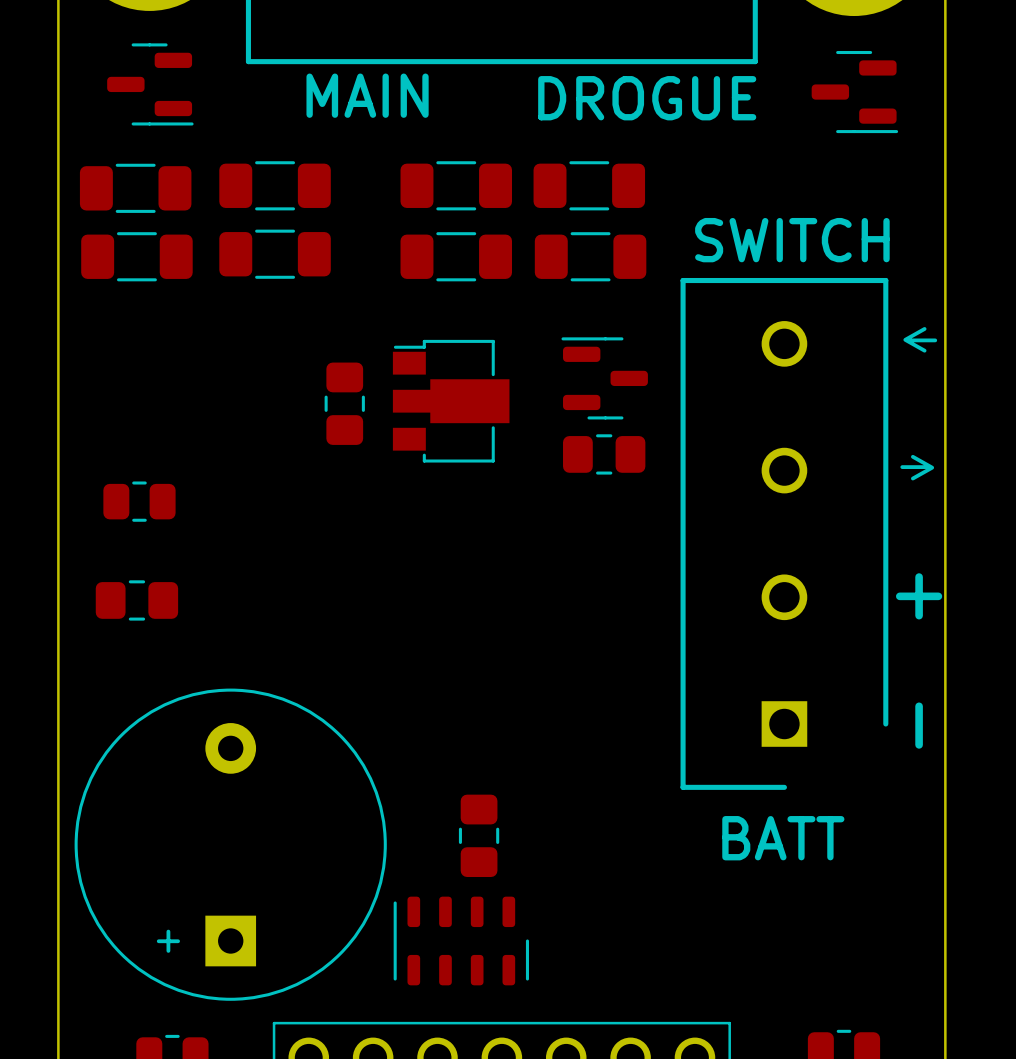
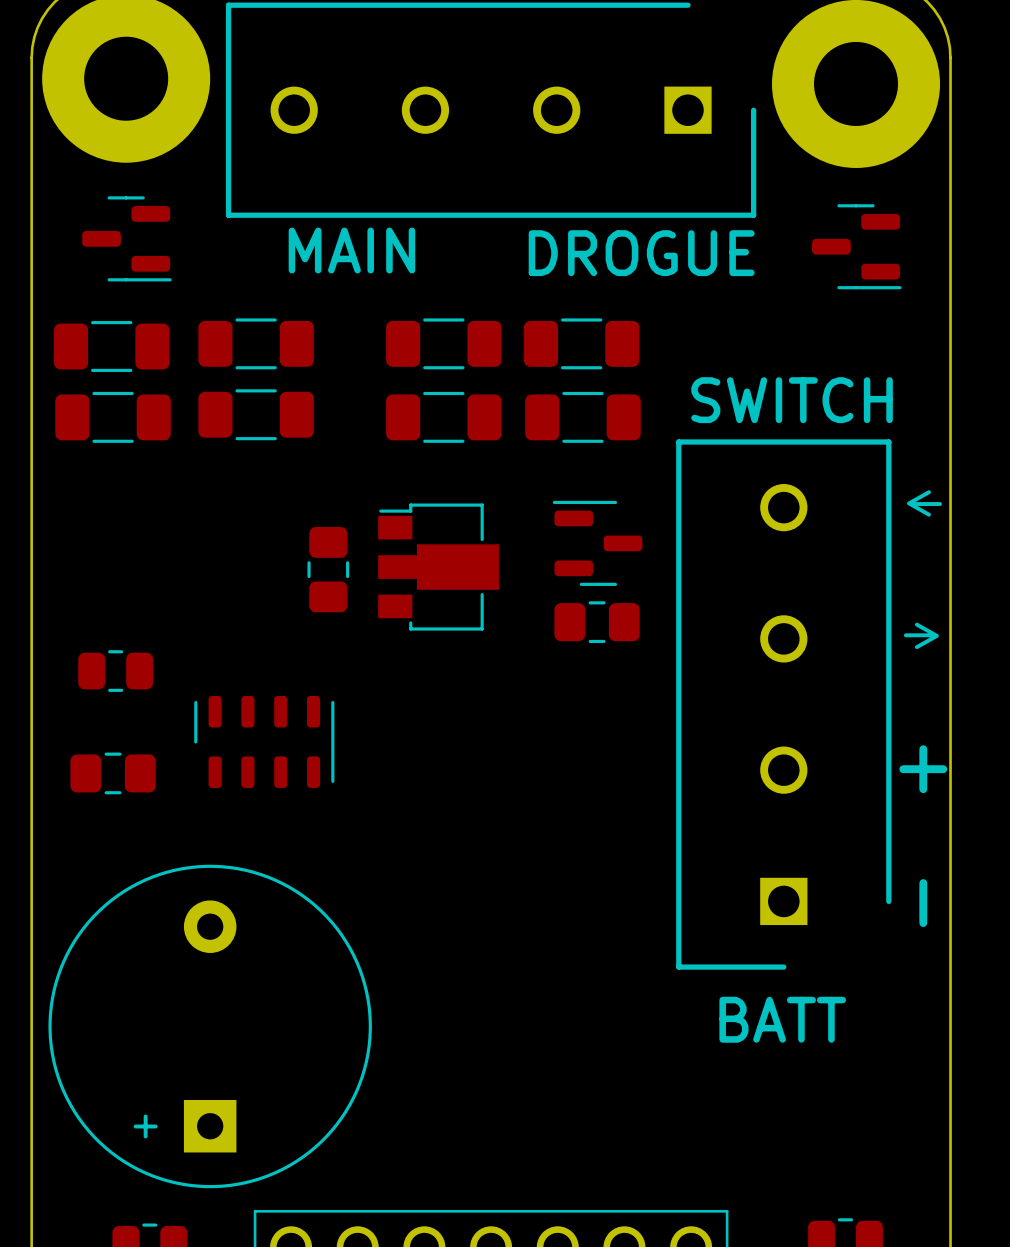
part: (479, 835) -> none
part rotation: 0° (461, 940) -> 180° (264, 741)
part position: (461, 940) -> (264, 741)

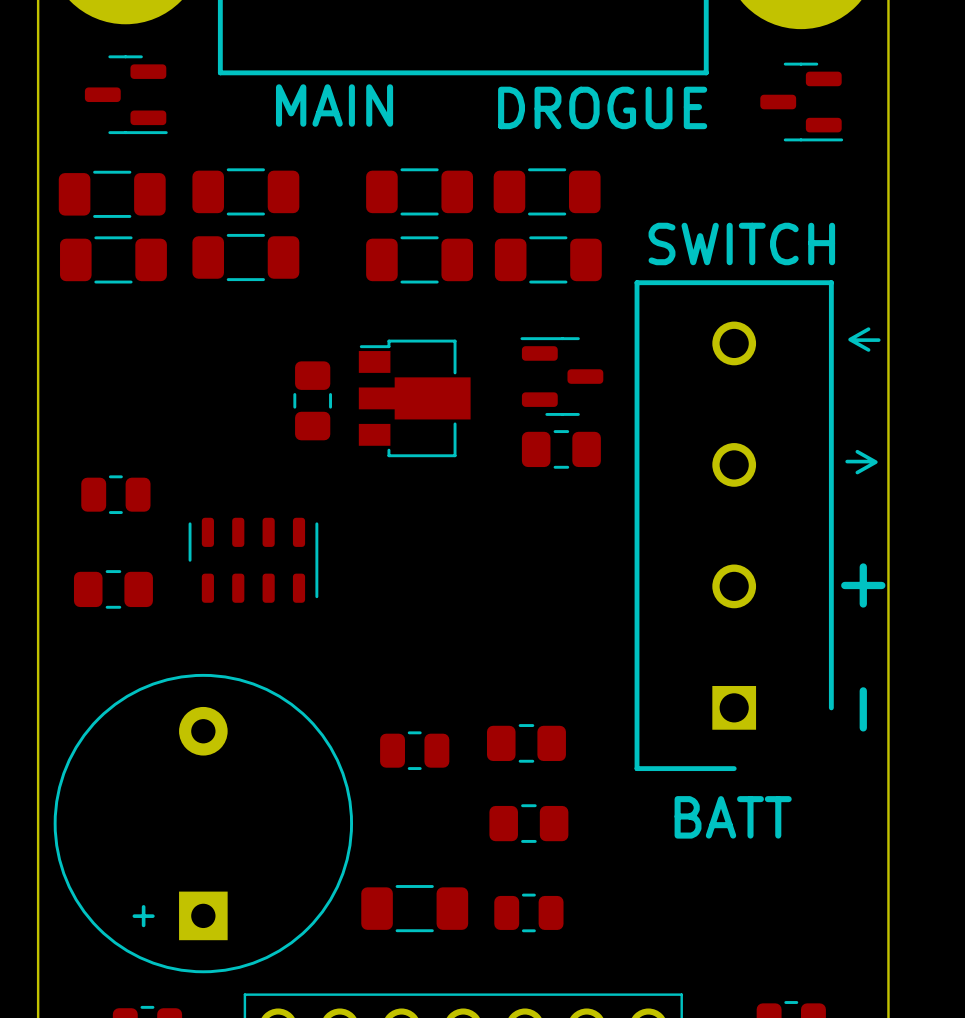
part: none -> (526, 743)
part: none -> (414, 750)
part: none -> (528, 823)
part: none -> (414, 908)
part: none -> (528, 912)

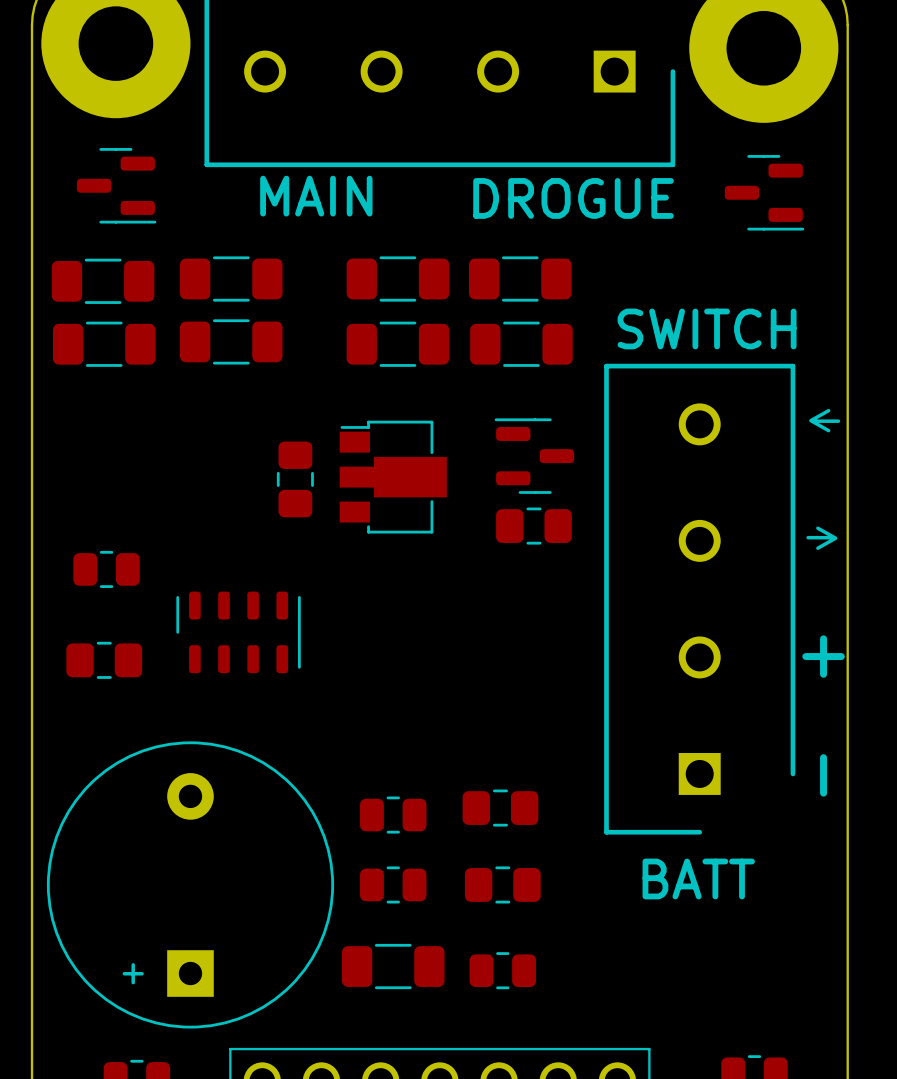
part: none -> (393, 884)

